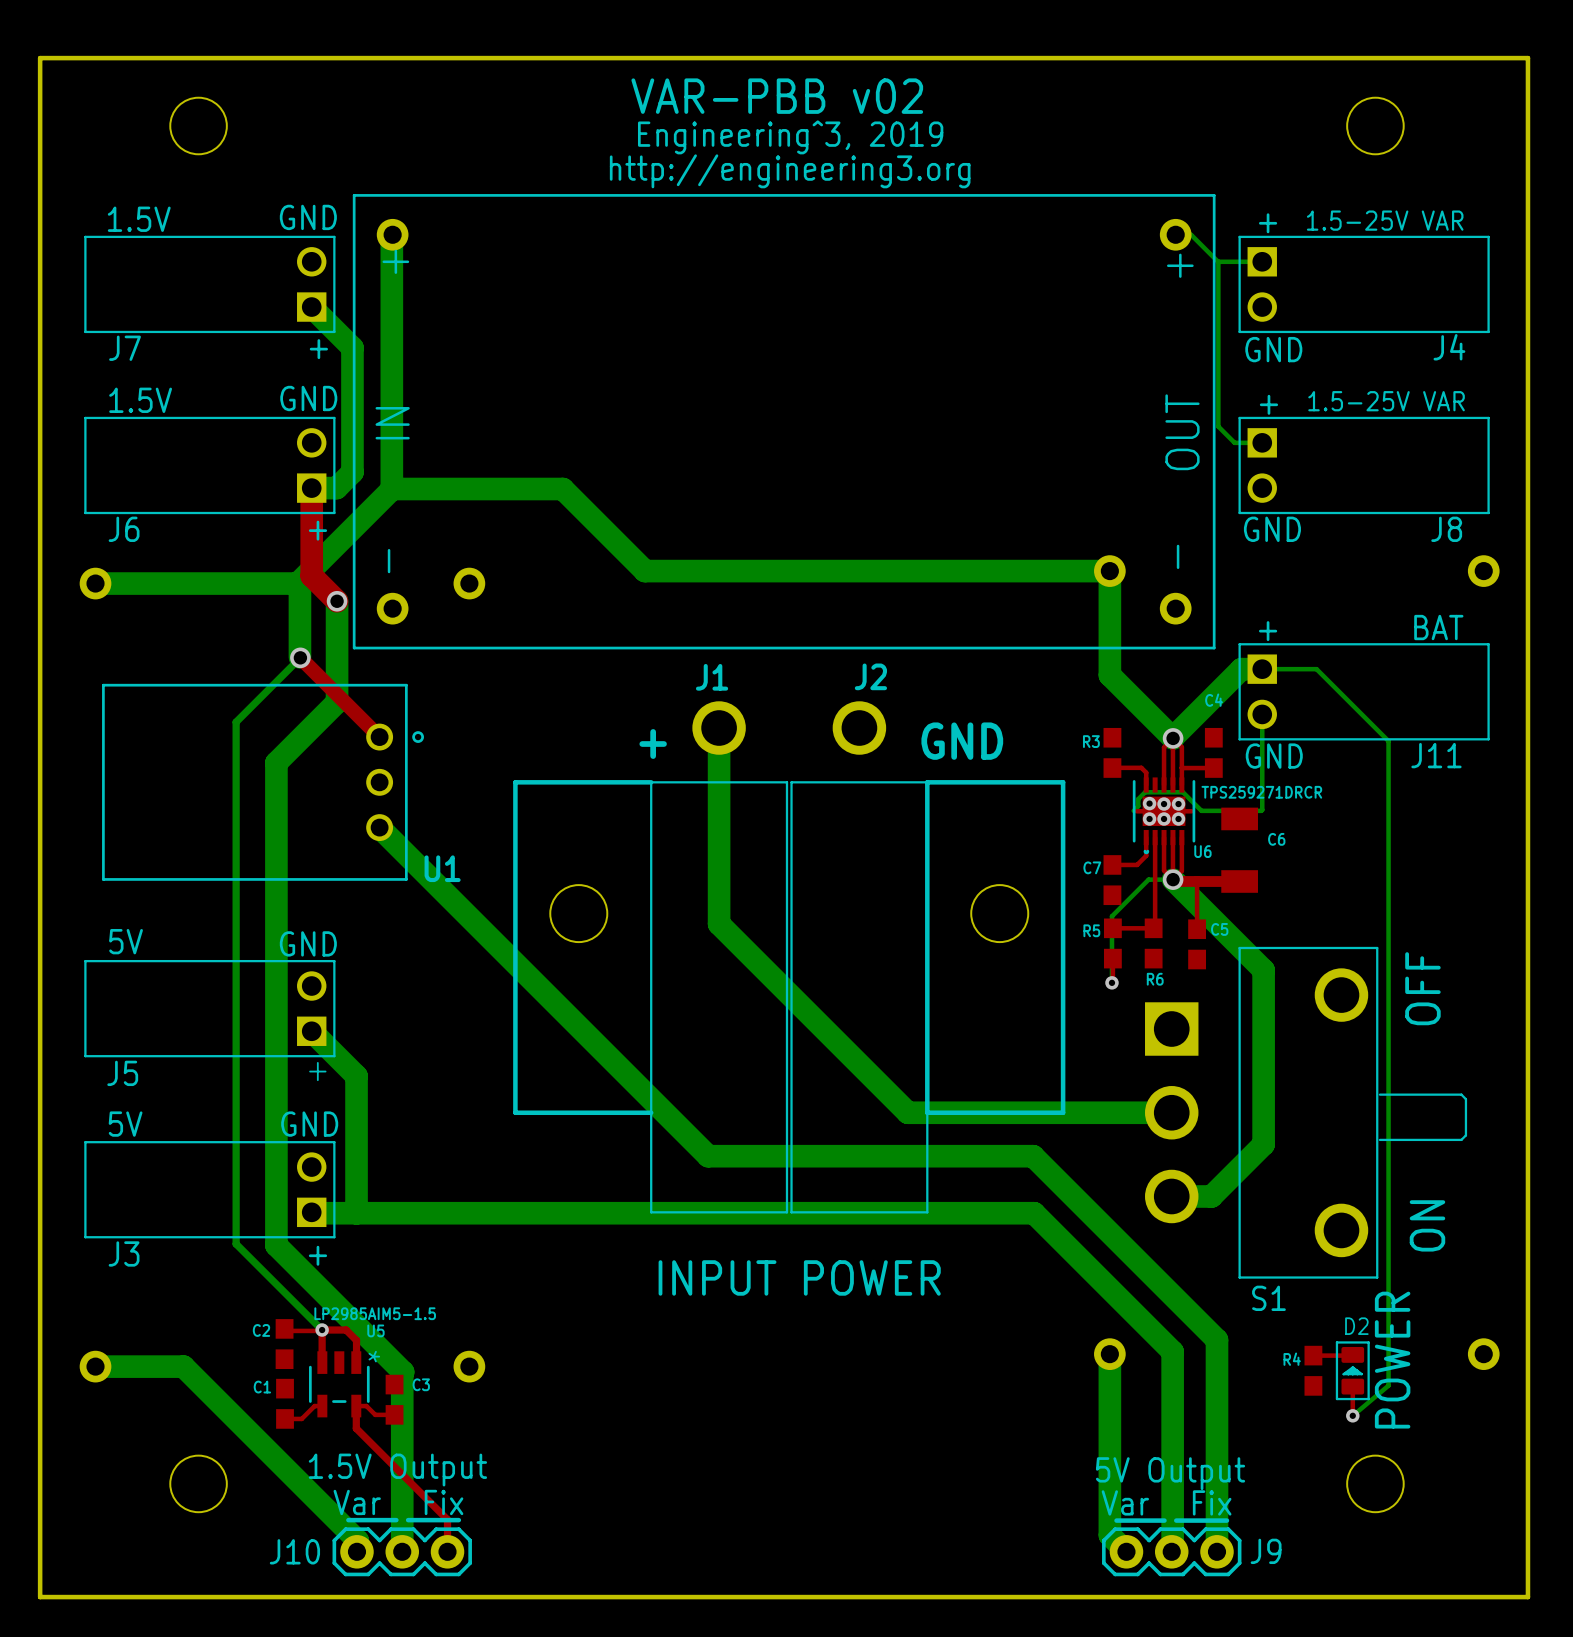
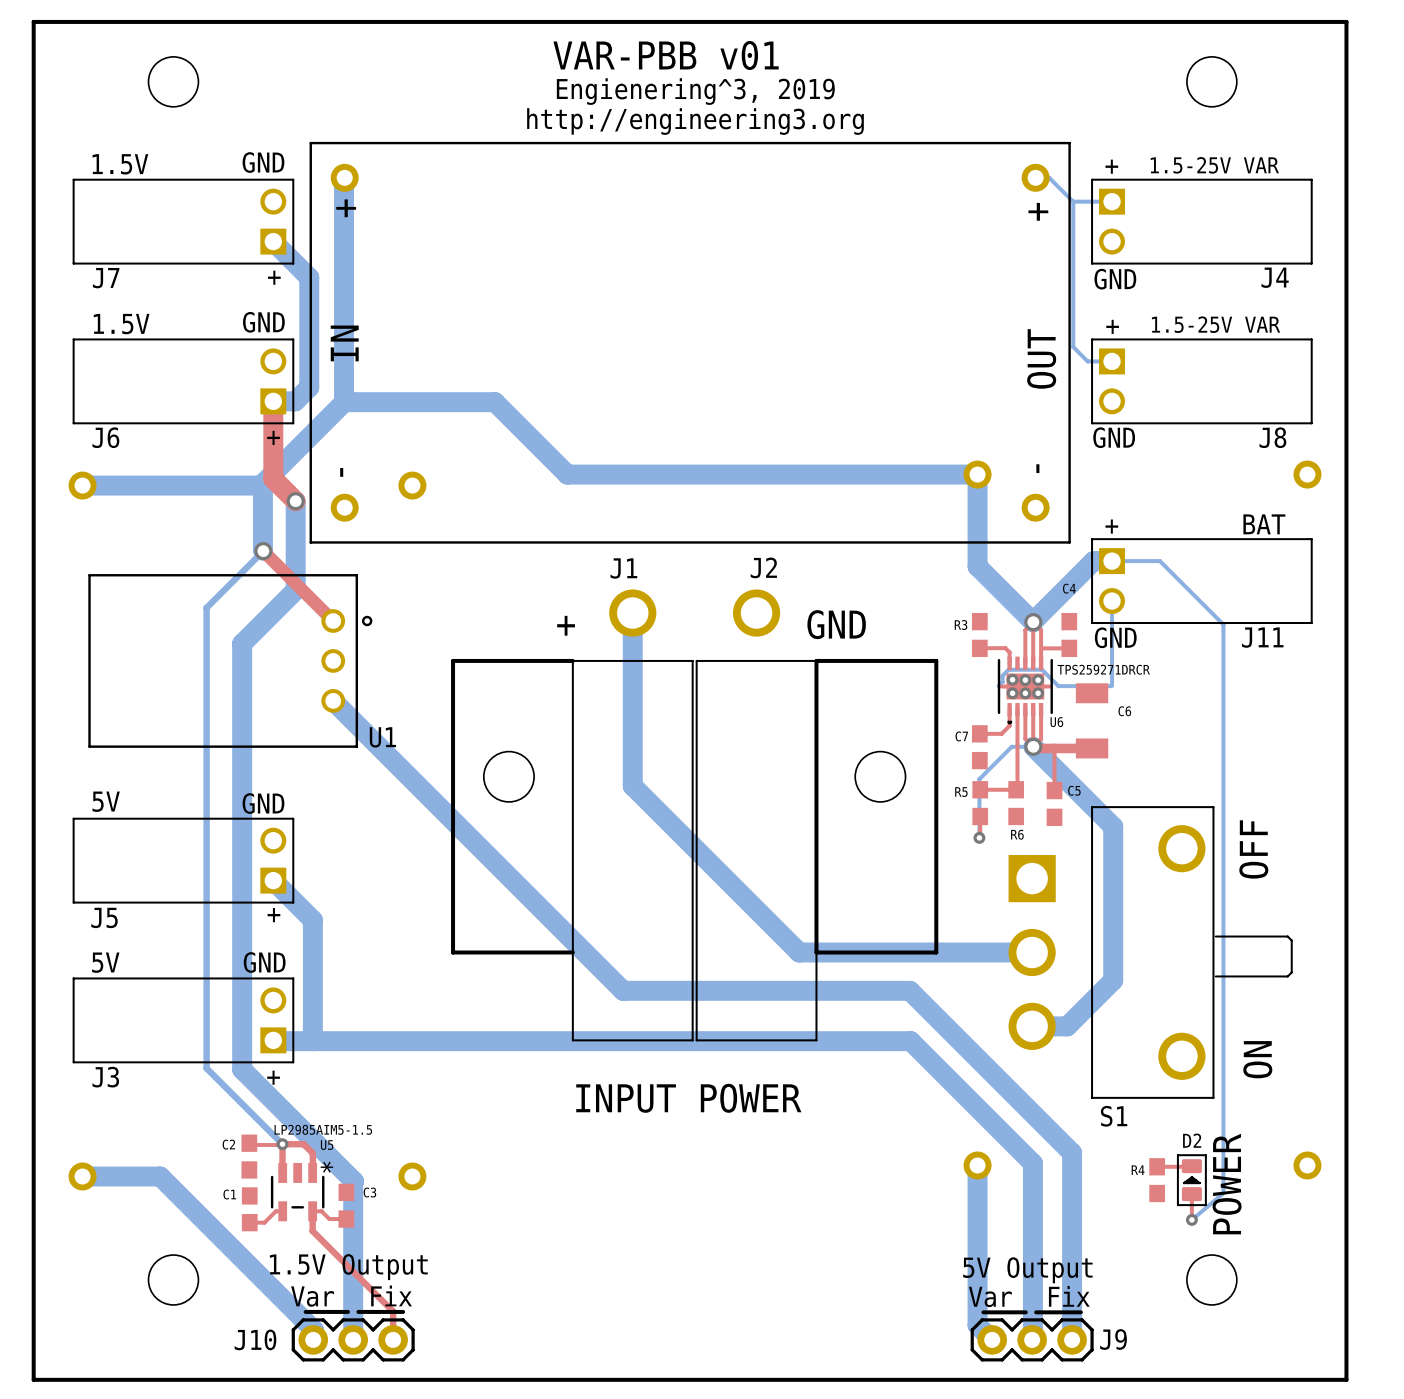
text: VAR-PBB v02 (777, 96) -> VAR-PBB v01 (666, 55)
text: Engineering^3, 2019 (790, 137) -> Engienering^3, 2019 (695, 91)

